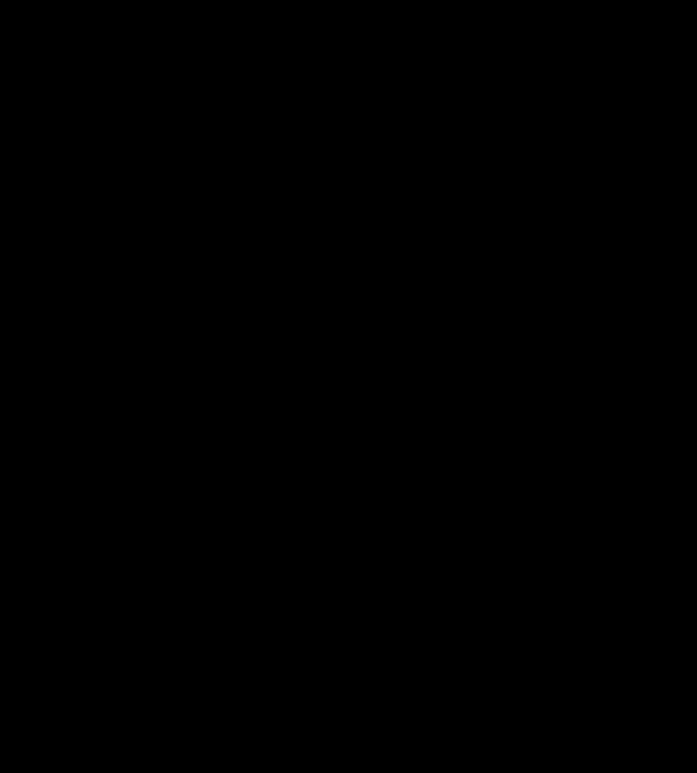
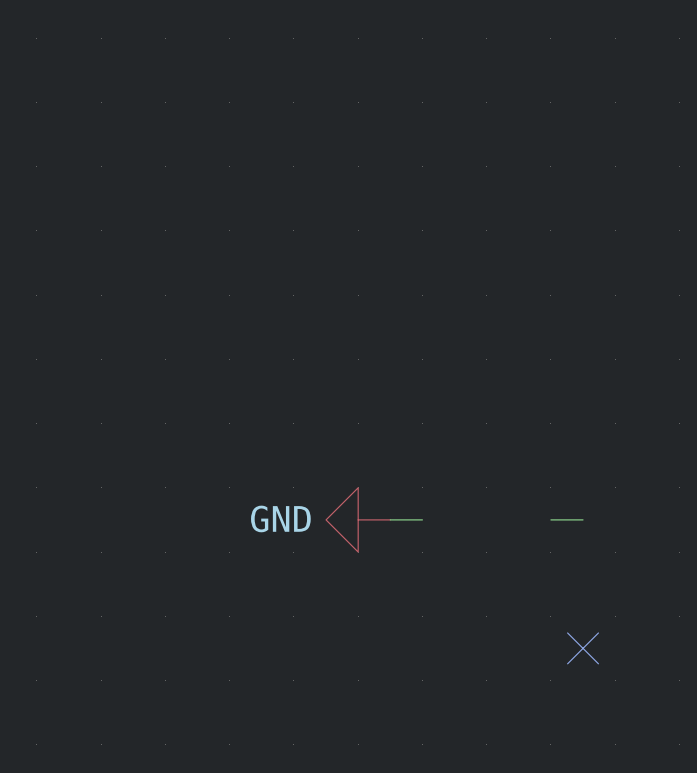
power symbol: none -> GND (358, 519)
wire: none -> (390, 519) (422, 519)
wire: none -> (550, 519) (583, 519)
no-connect mark: none -> (583, 648)

